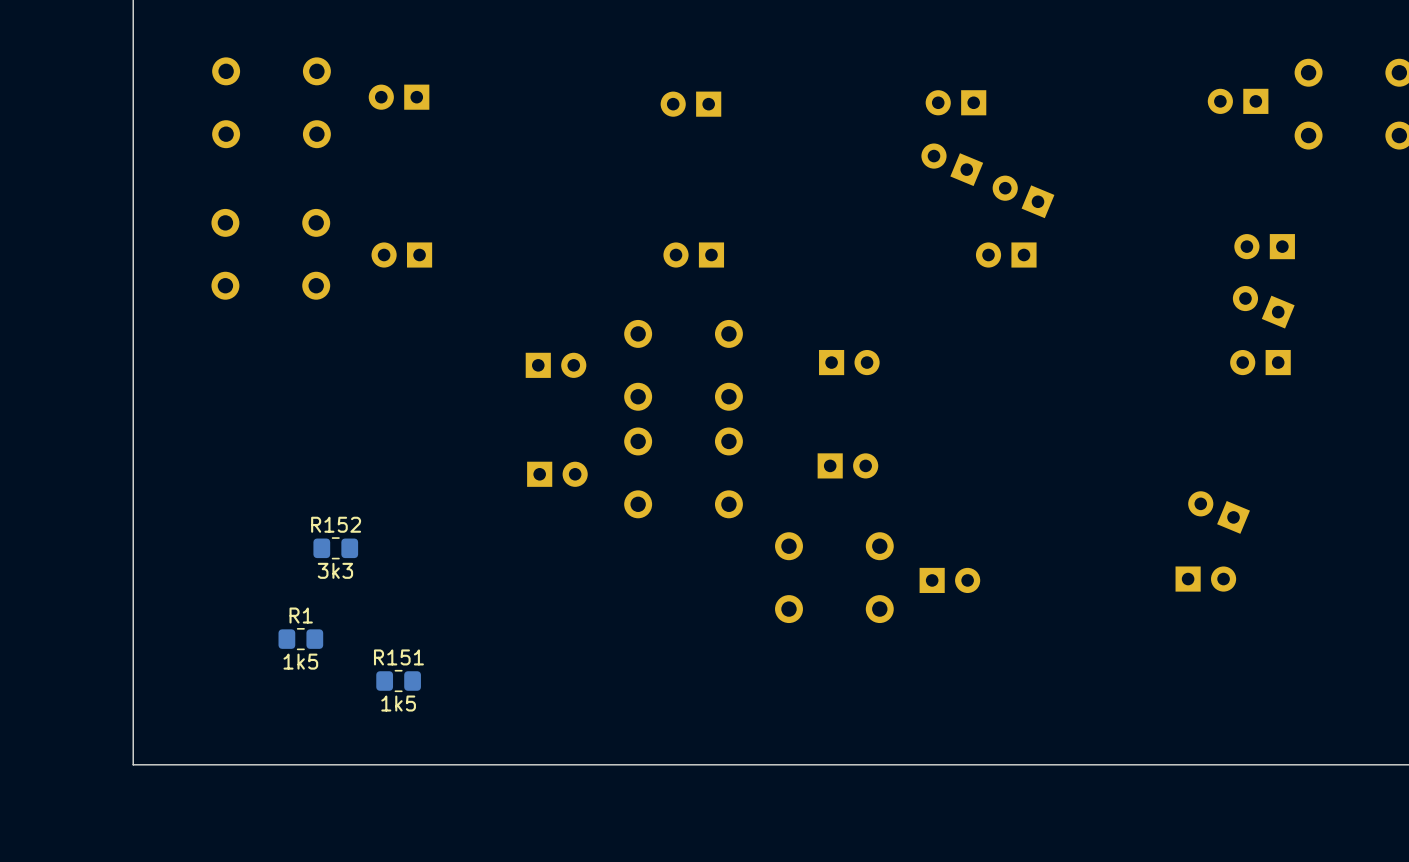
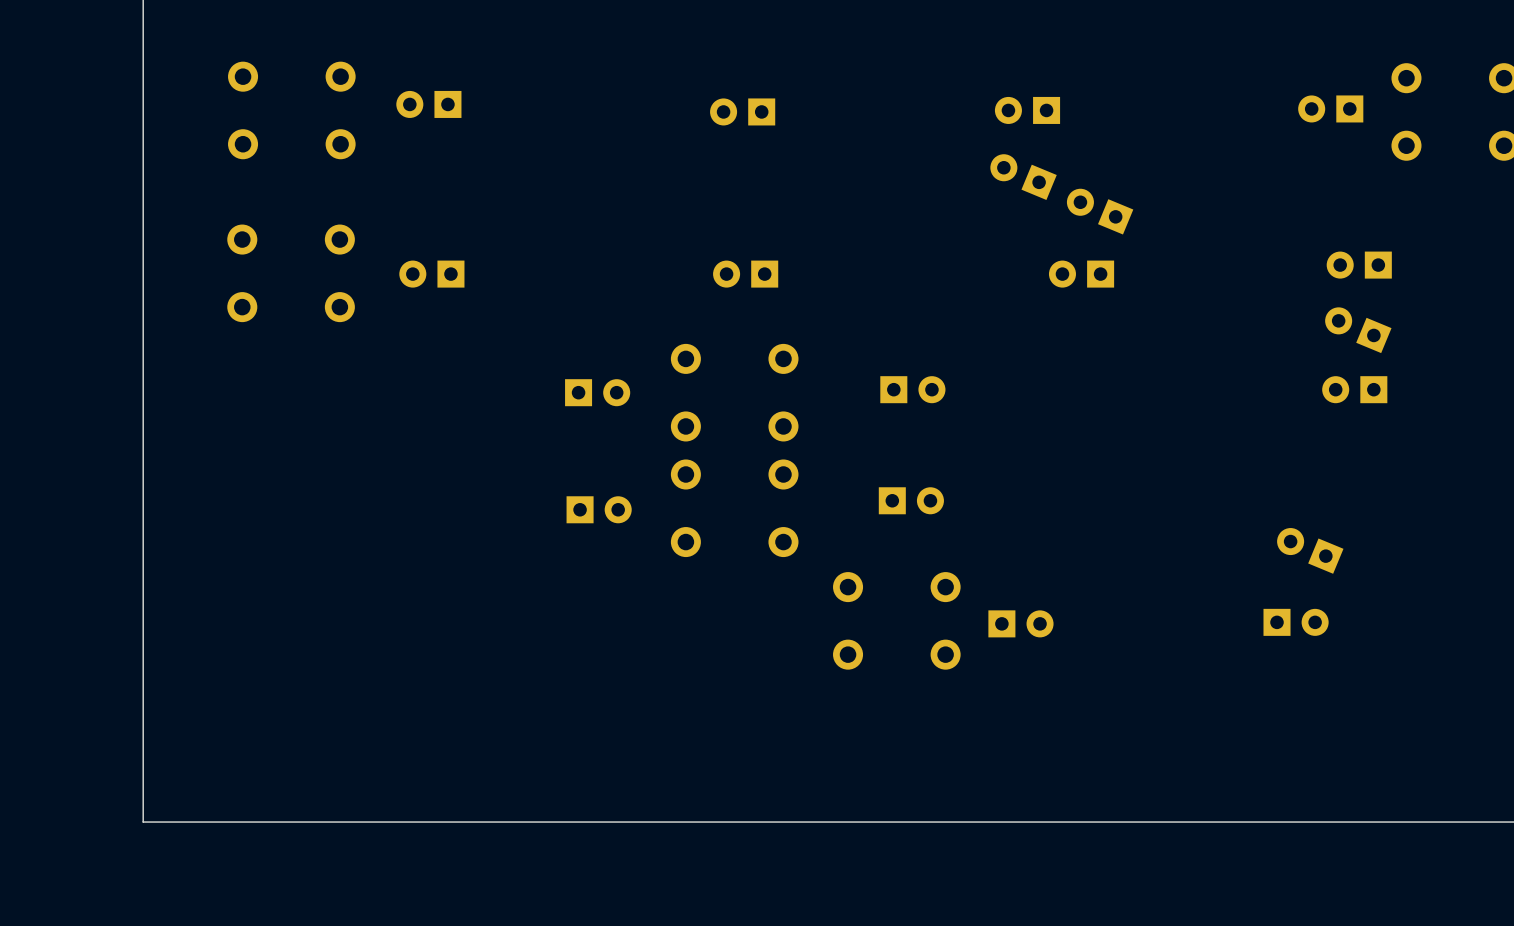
R152: 3k3 (335, 548) -> none
R1: 1k5 (300, 639) -> none
R151: 1k5 (398, 681) -> none

